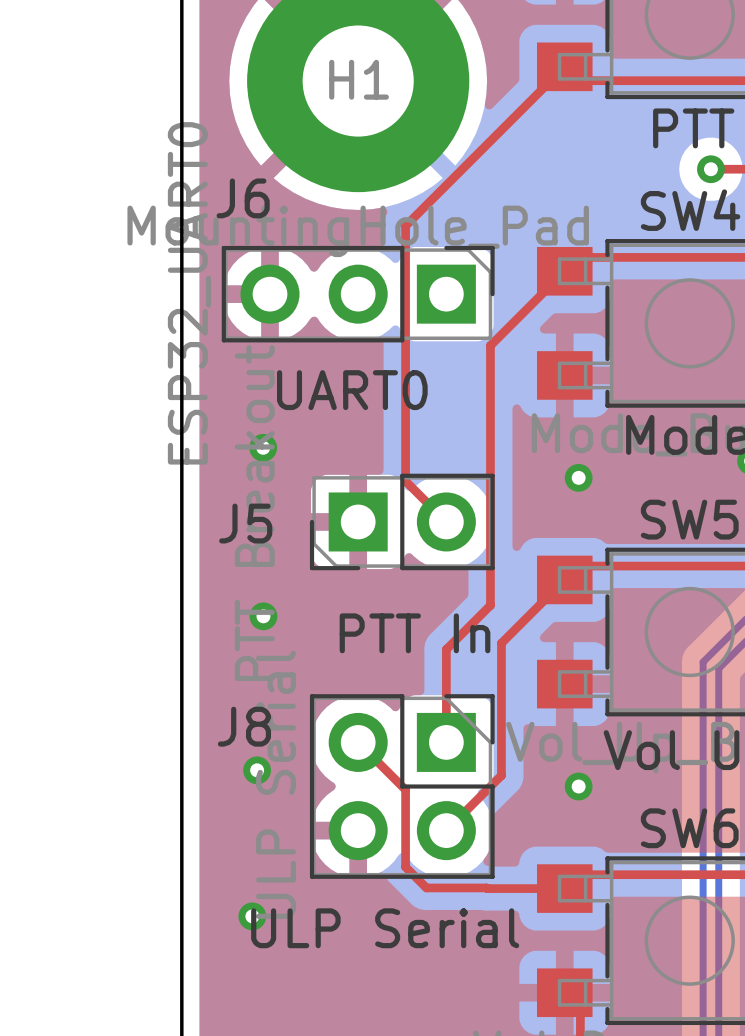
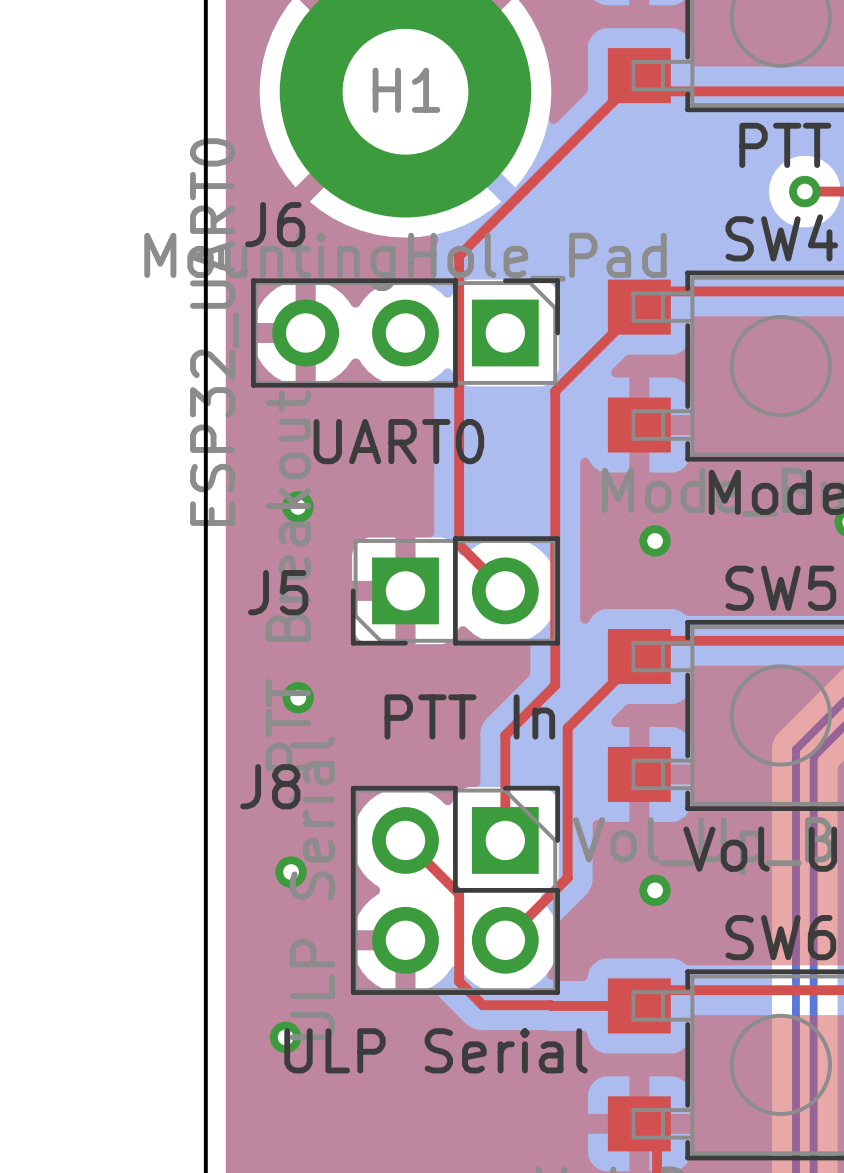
J8 name position: J8 (244, 726) -> J8 (270, 786)

